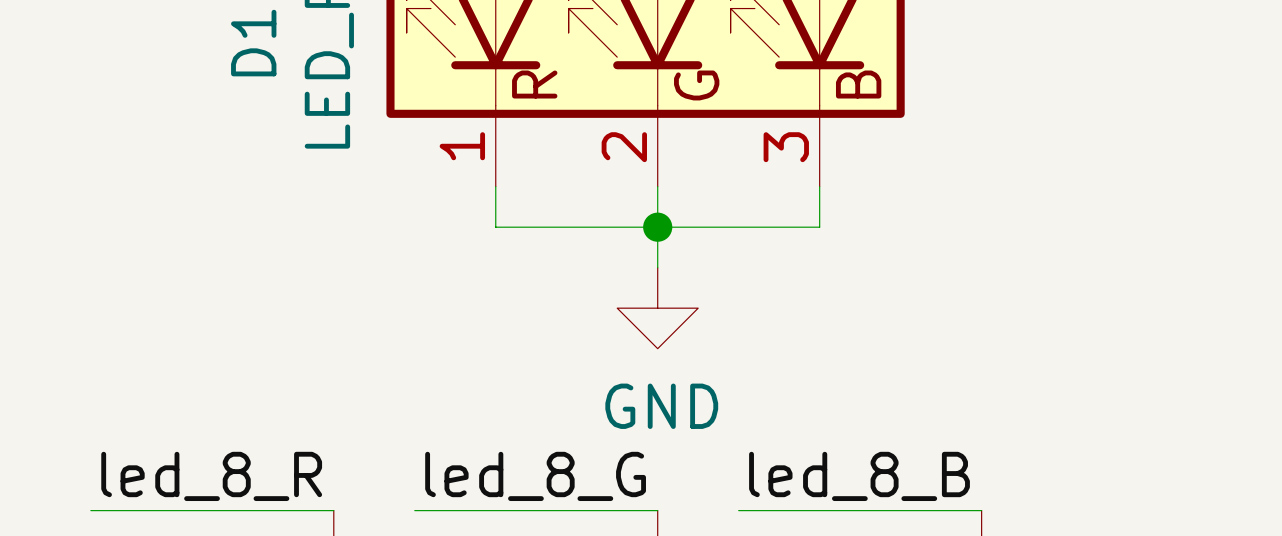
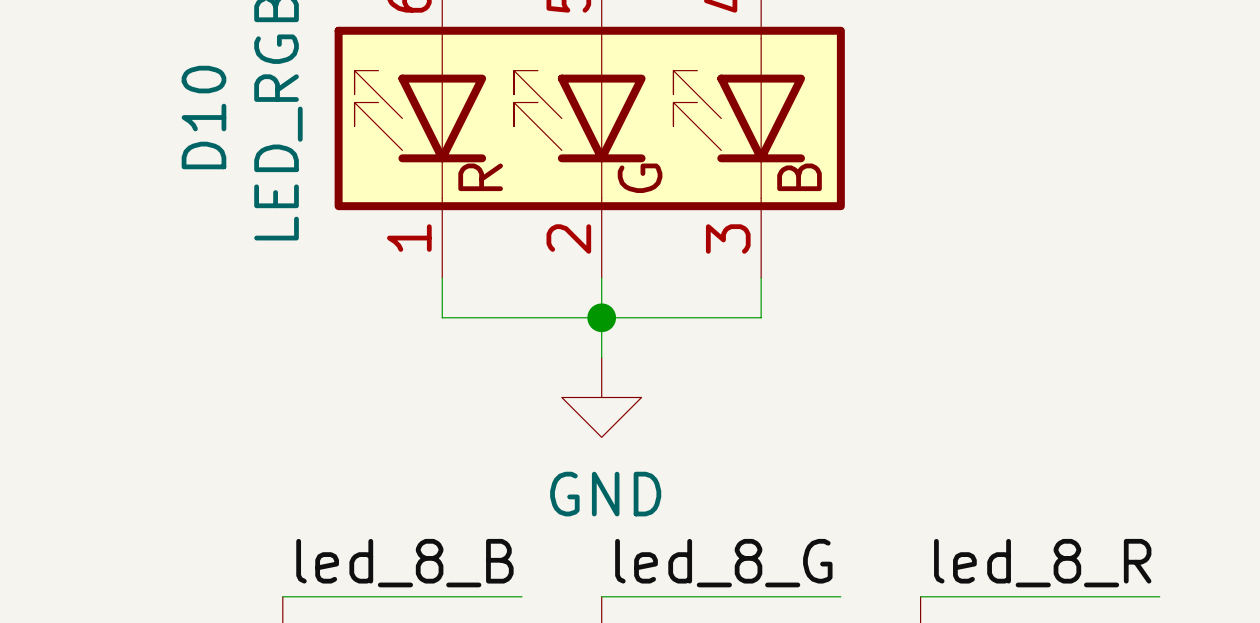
label: led_8_R (211, 476) -> none
label position: led_8_G (535, 476) -> led_8_G (723, 563)
label position: led_8_B (859, 476) -> led_8_B (404, 563)
label: none -> led_8_R (1042, 563)
wire: (90, 510) (333, 510) -> (362, 596) (282, 596)
wire: (576, 510) (657, 510) -> (681, 596) (601, 596)
wire: (900, 510) (981, 510) -> (1159, 596) (920, 596)

